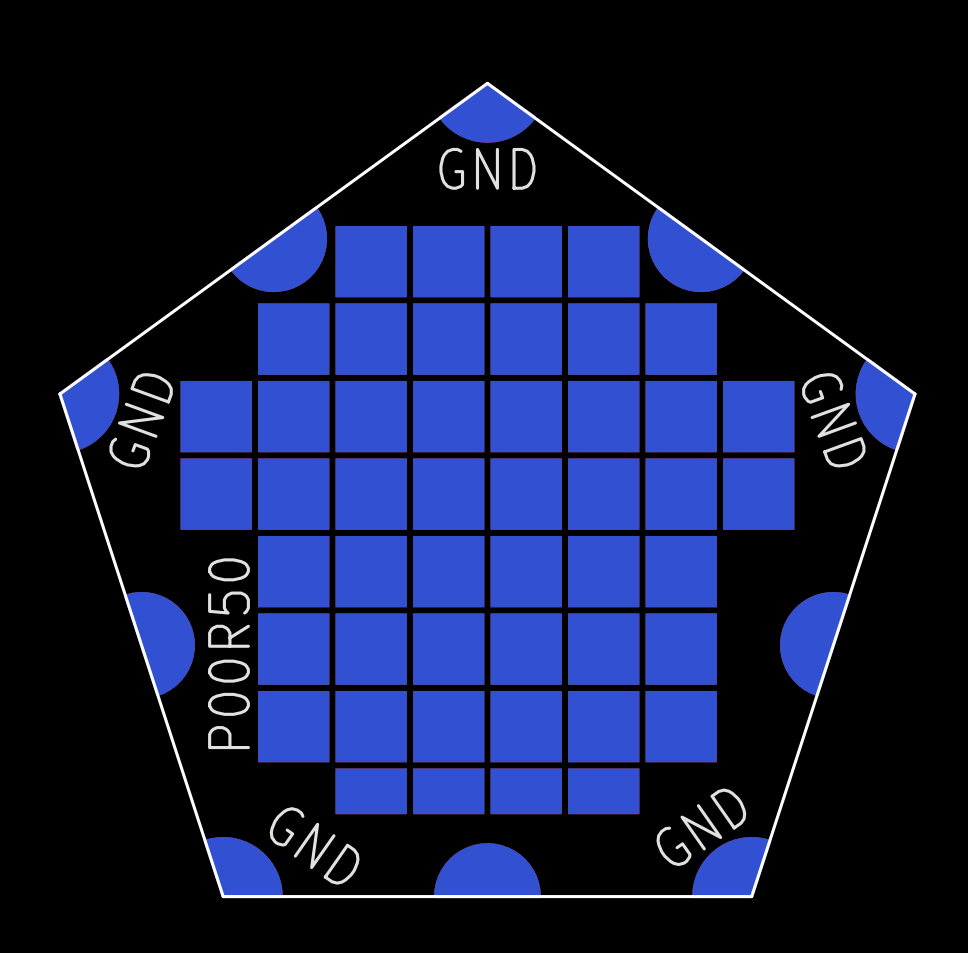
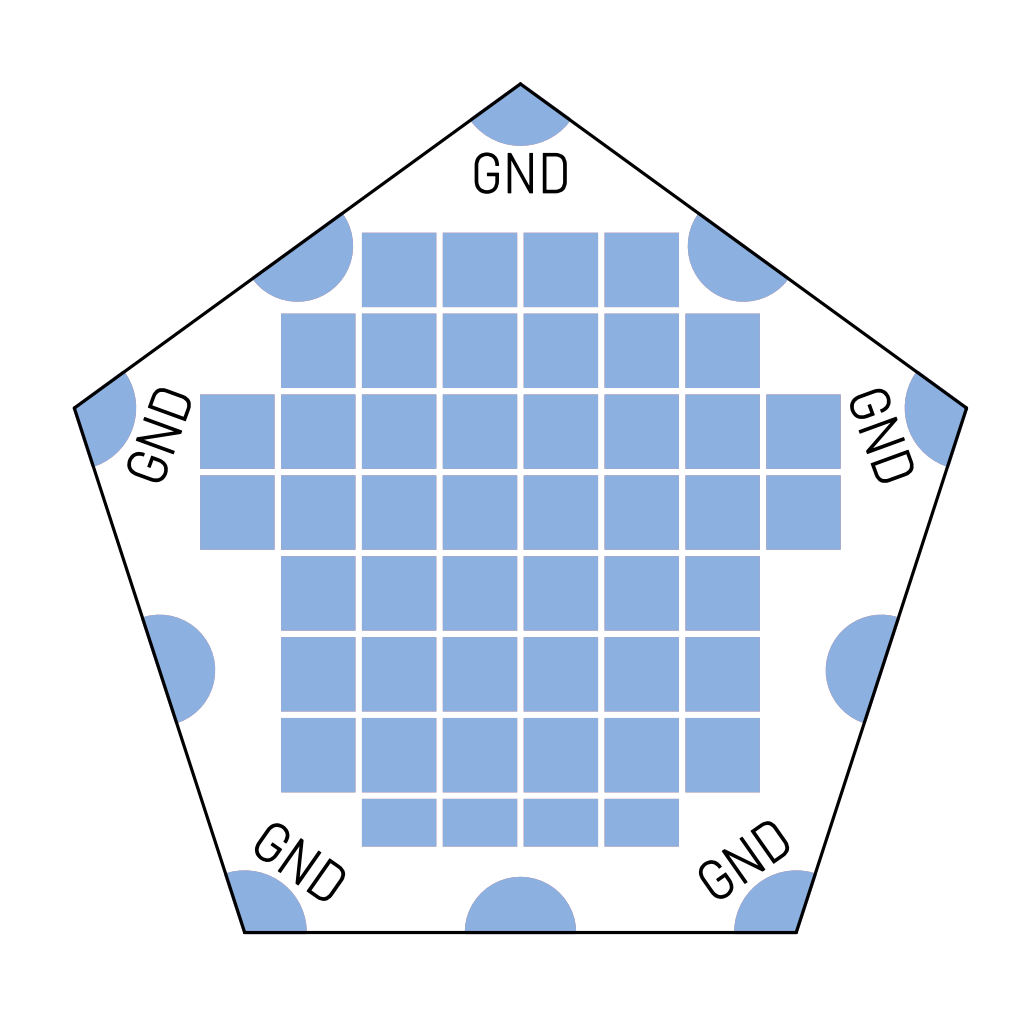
text: P00R50 (229, 653) -> none
text position: GND (314, 845) -> GND (300, 862)

